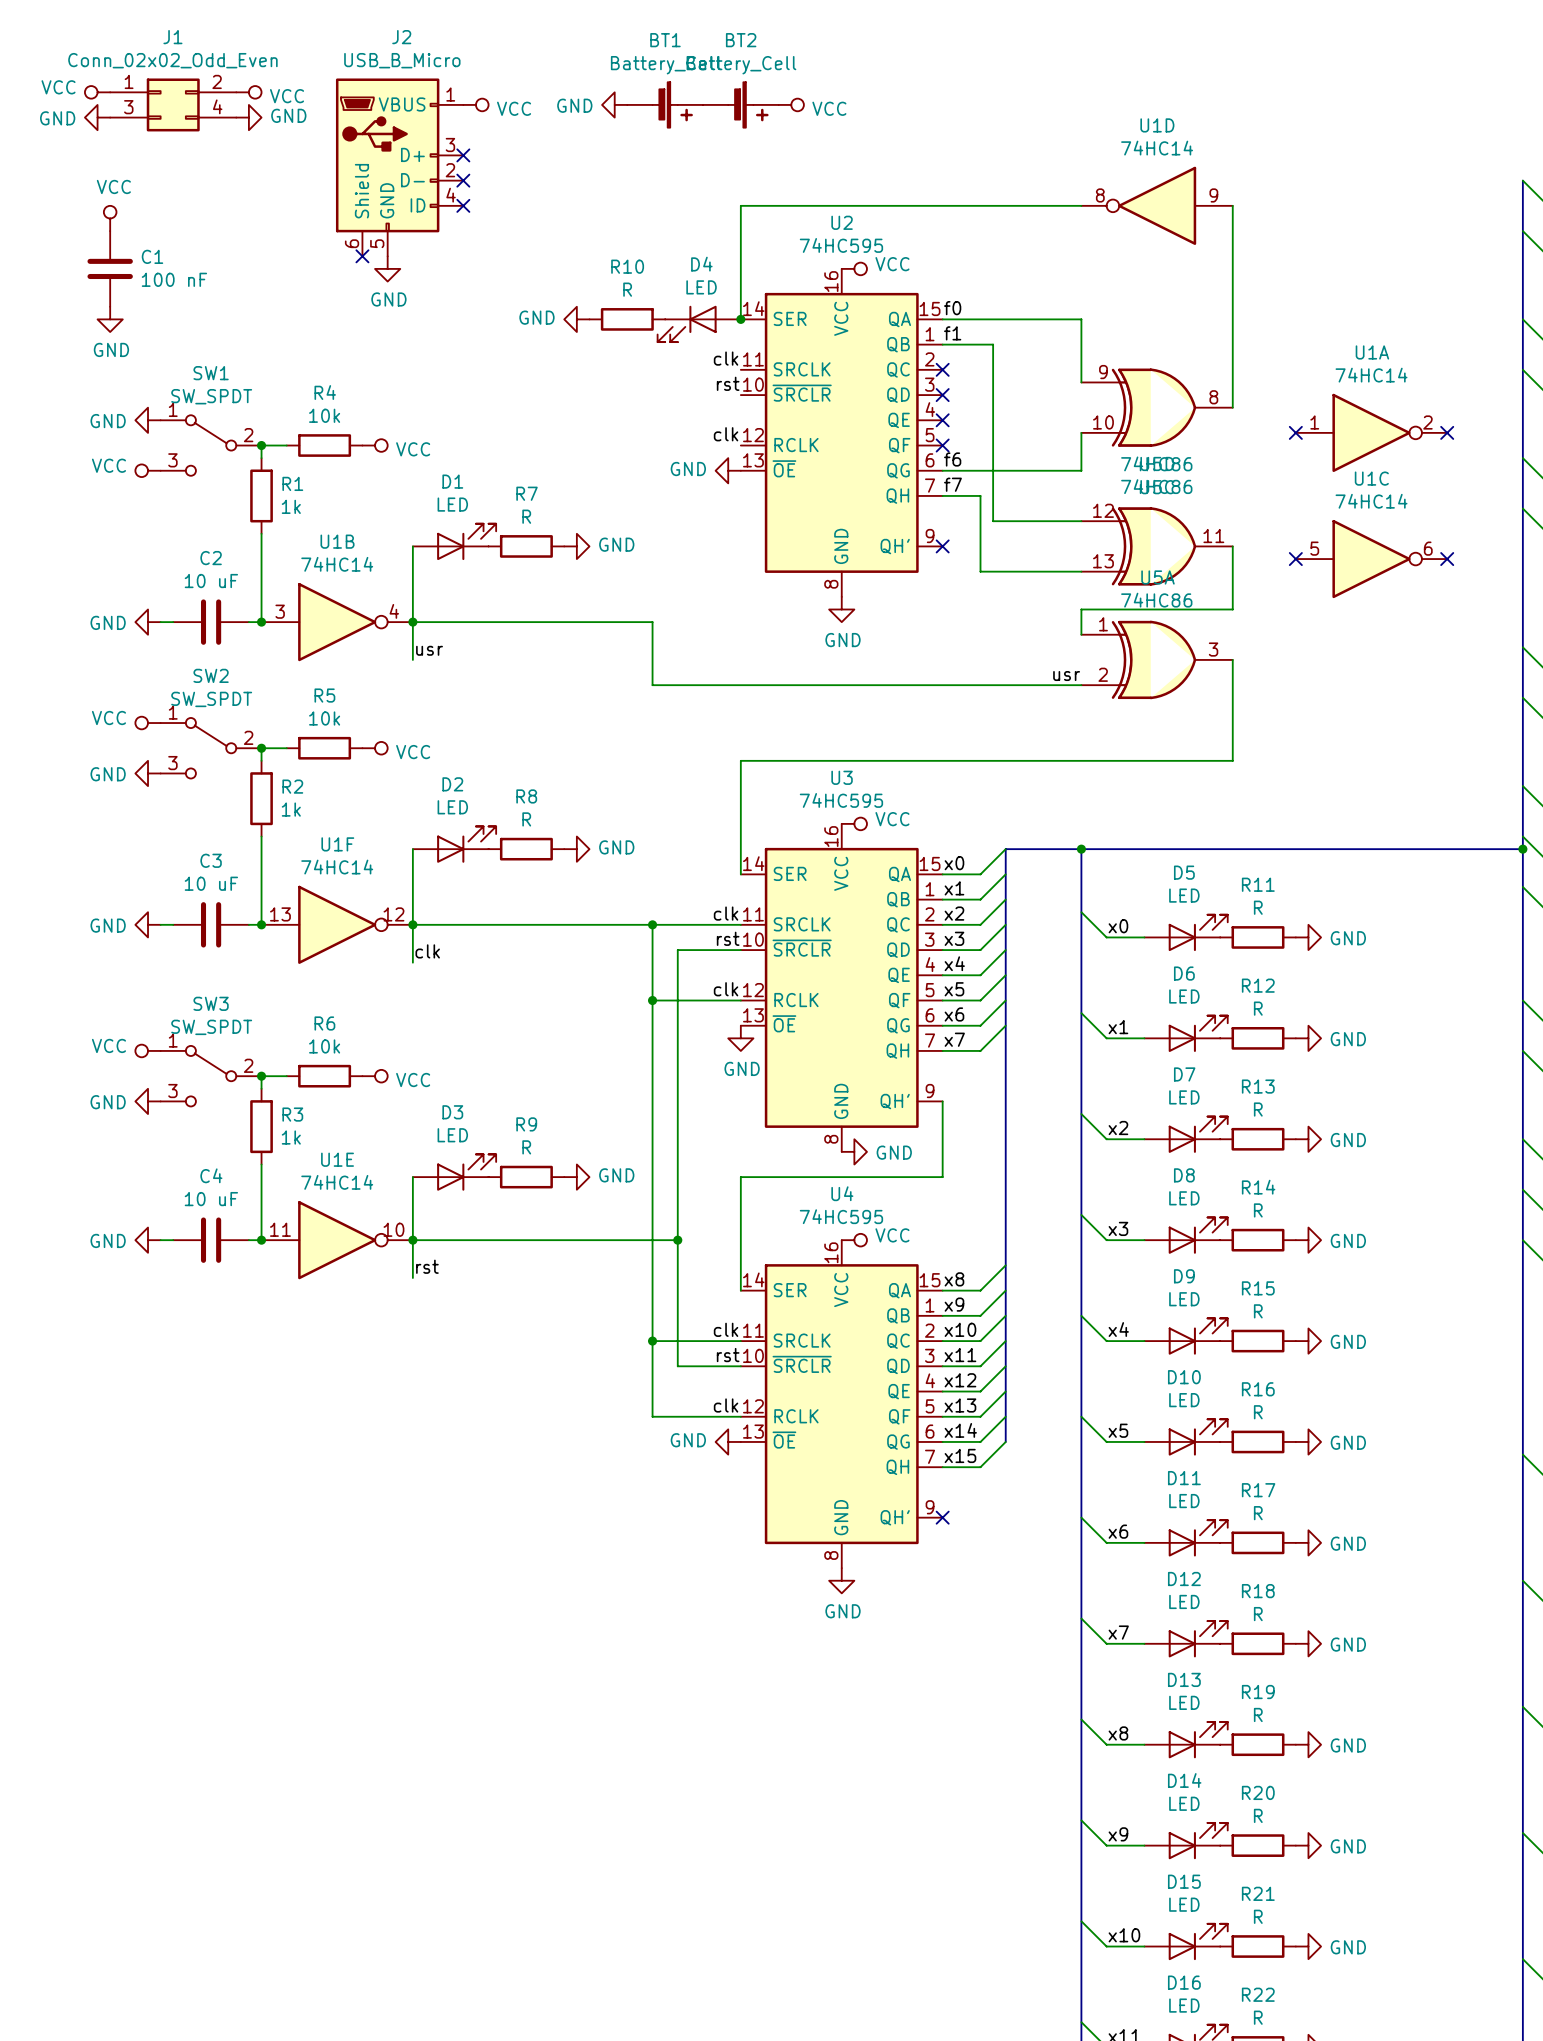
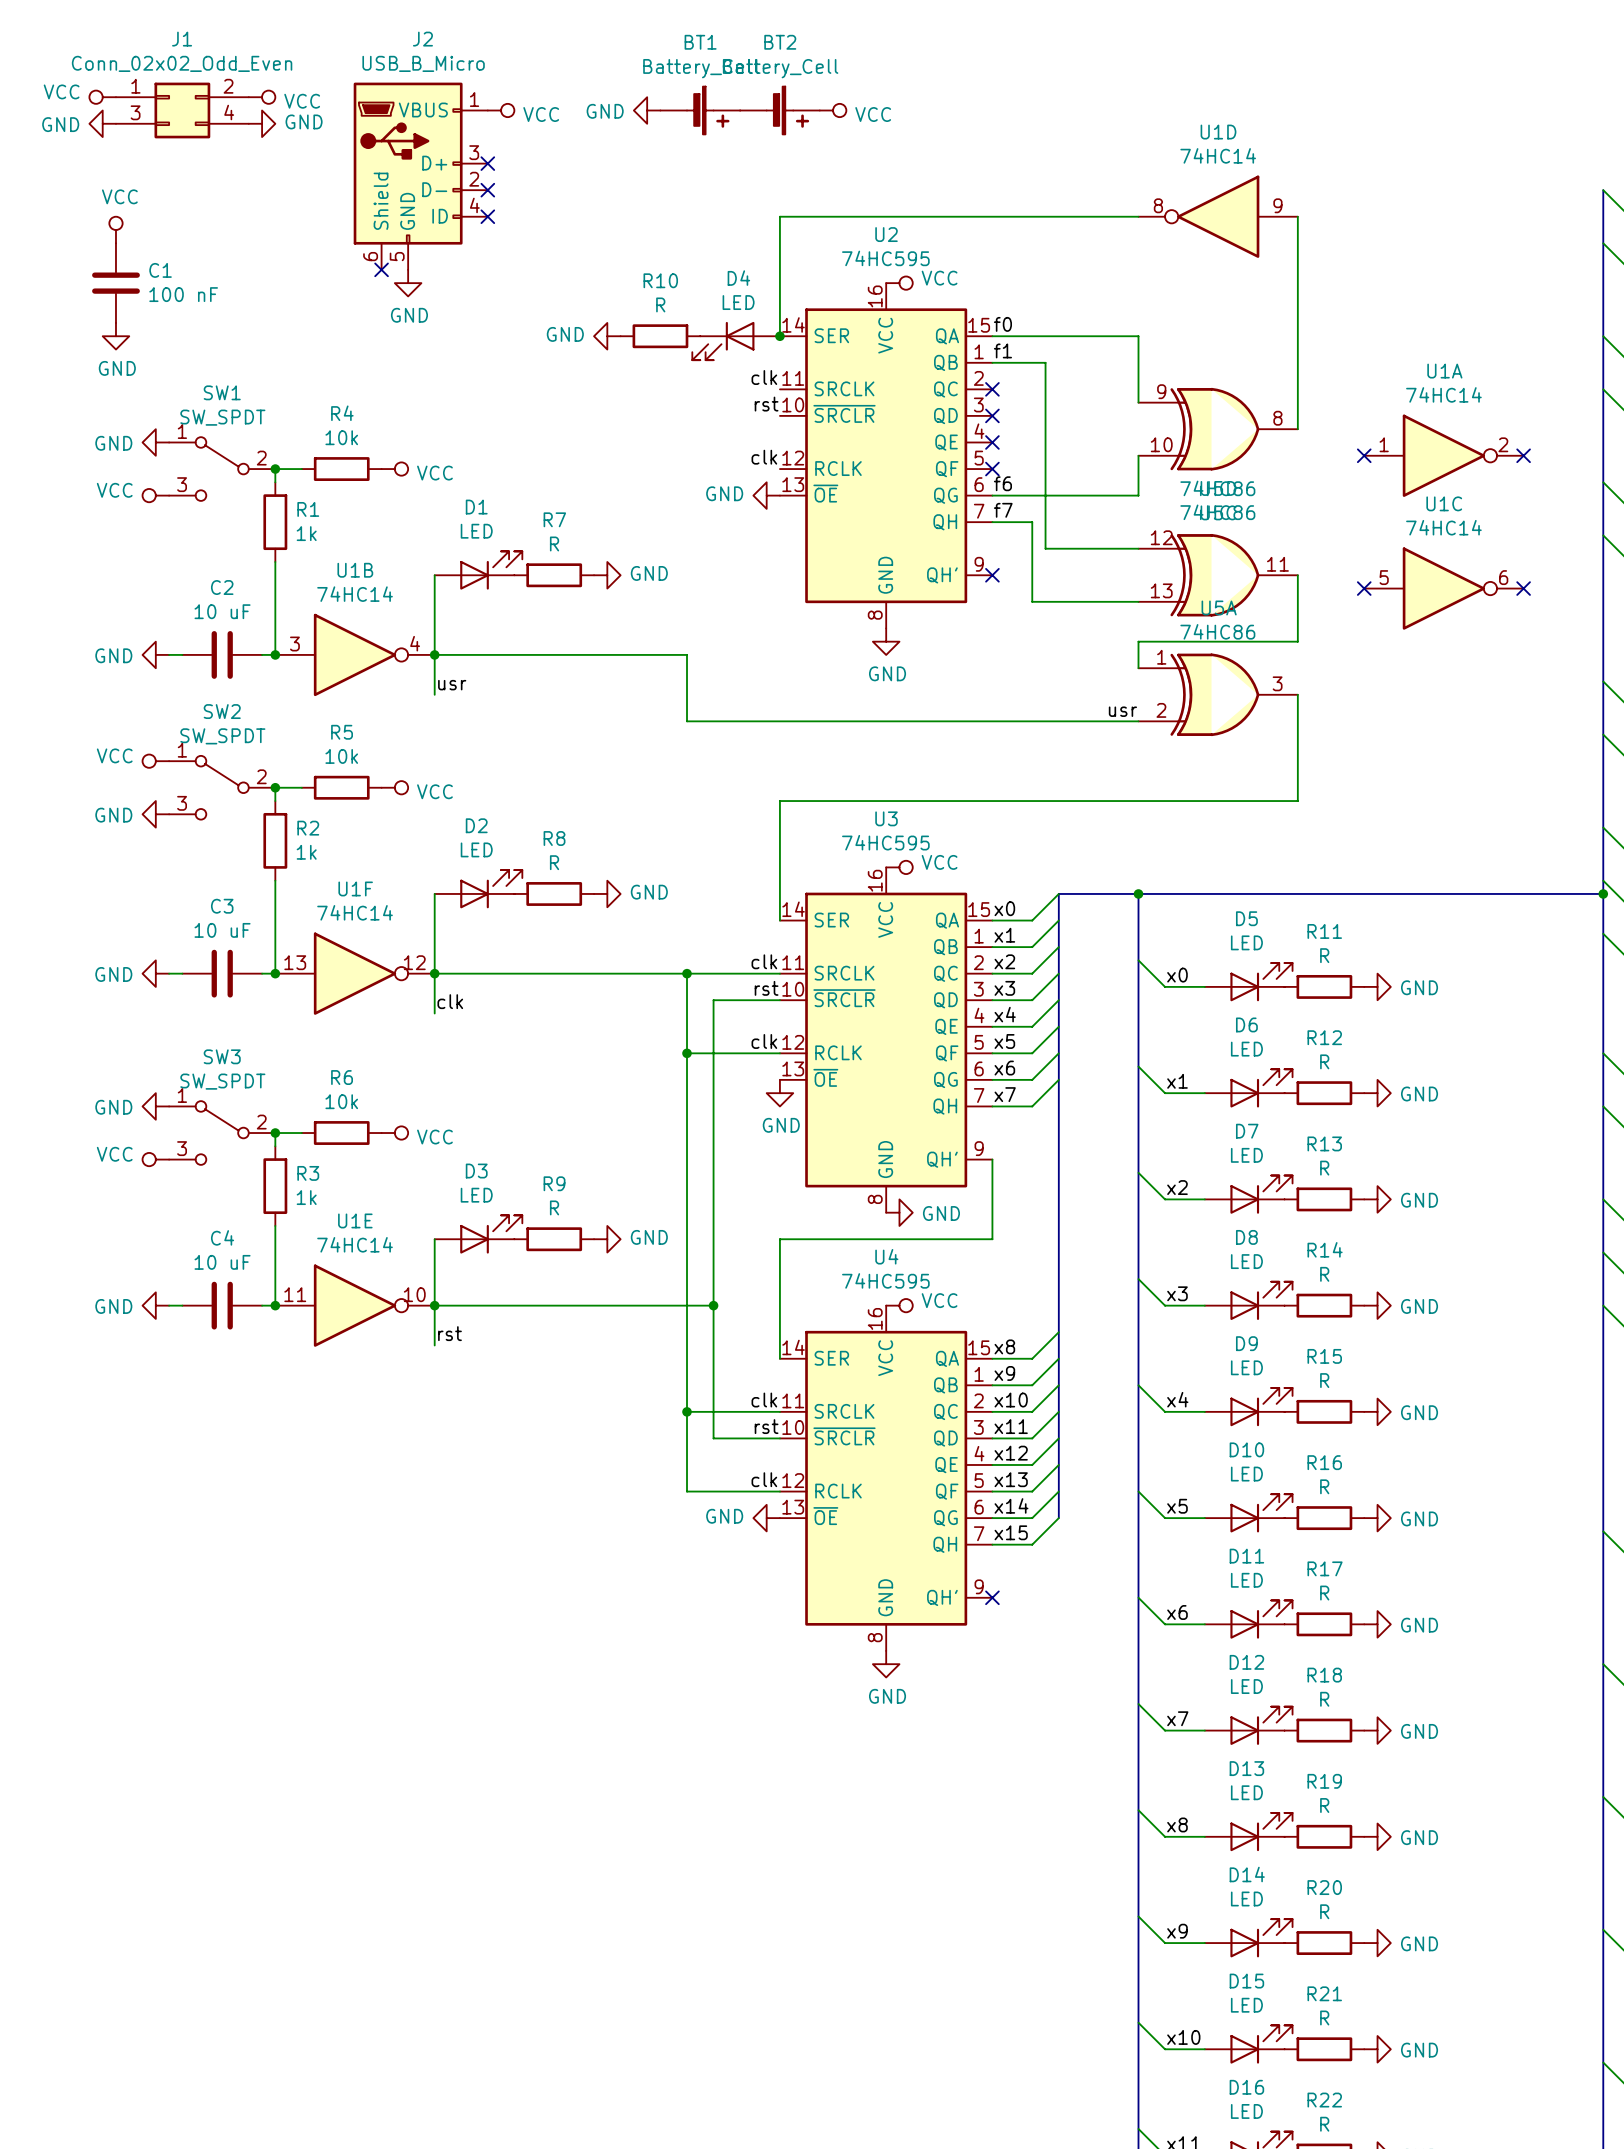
power symbol: VCC (148, 1050) -> GND (155, 1106)
power symbol: GND (148, 1101) -> VCC (155, 1159)

